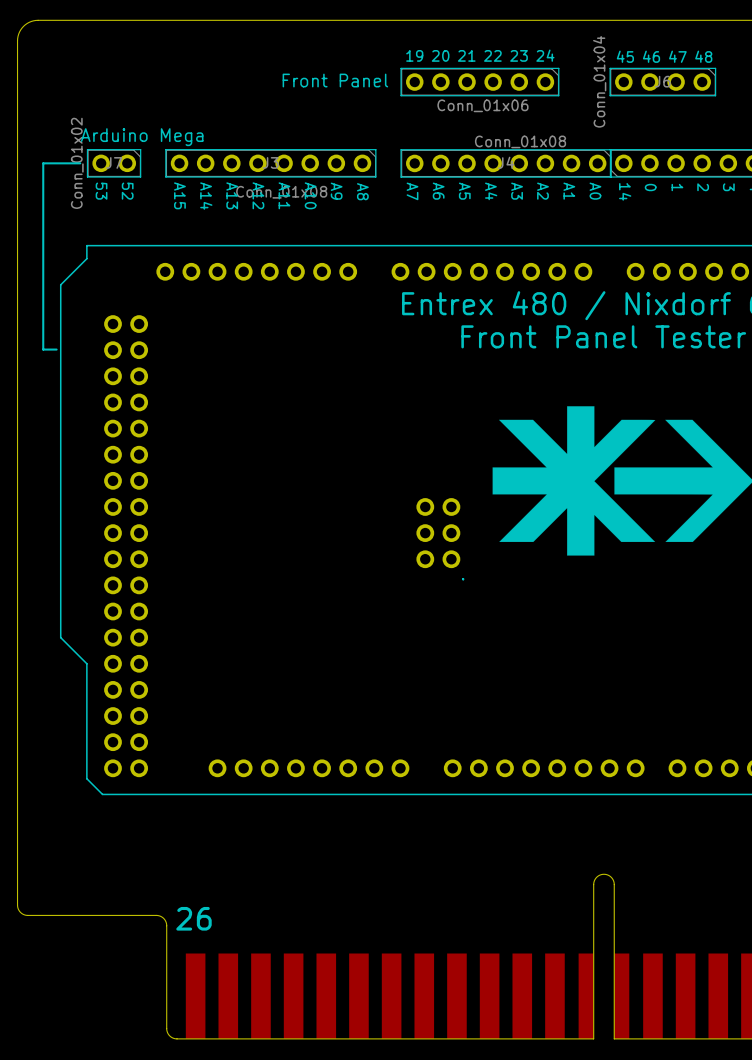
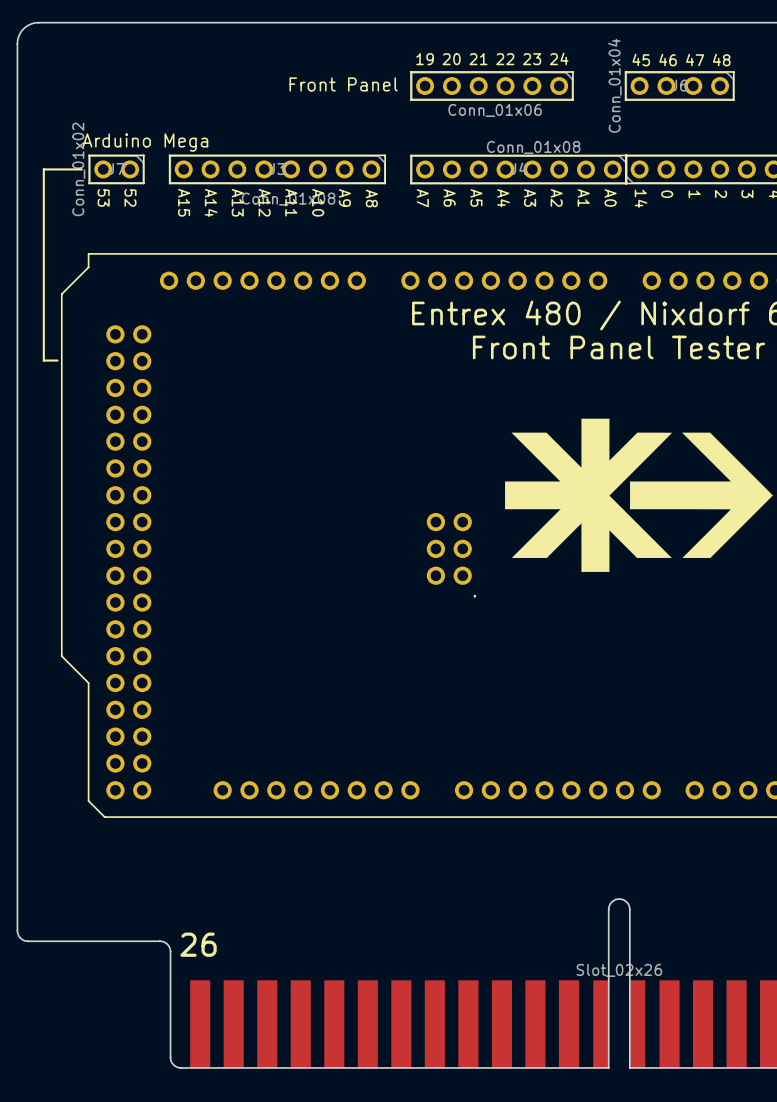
part value: none -> Slot_02x26 (619, 970)

